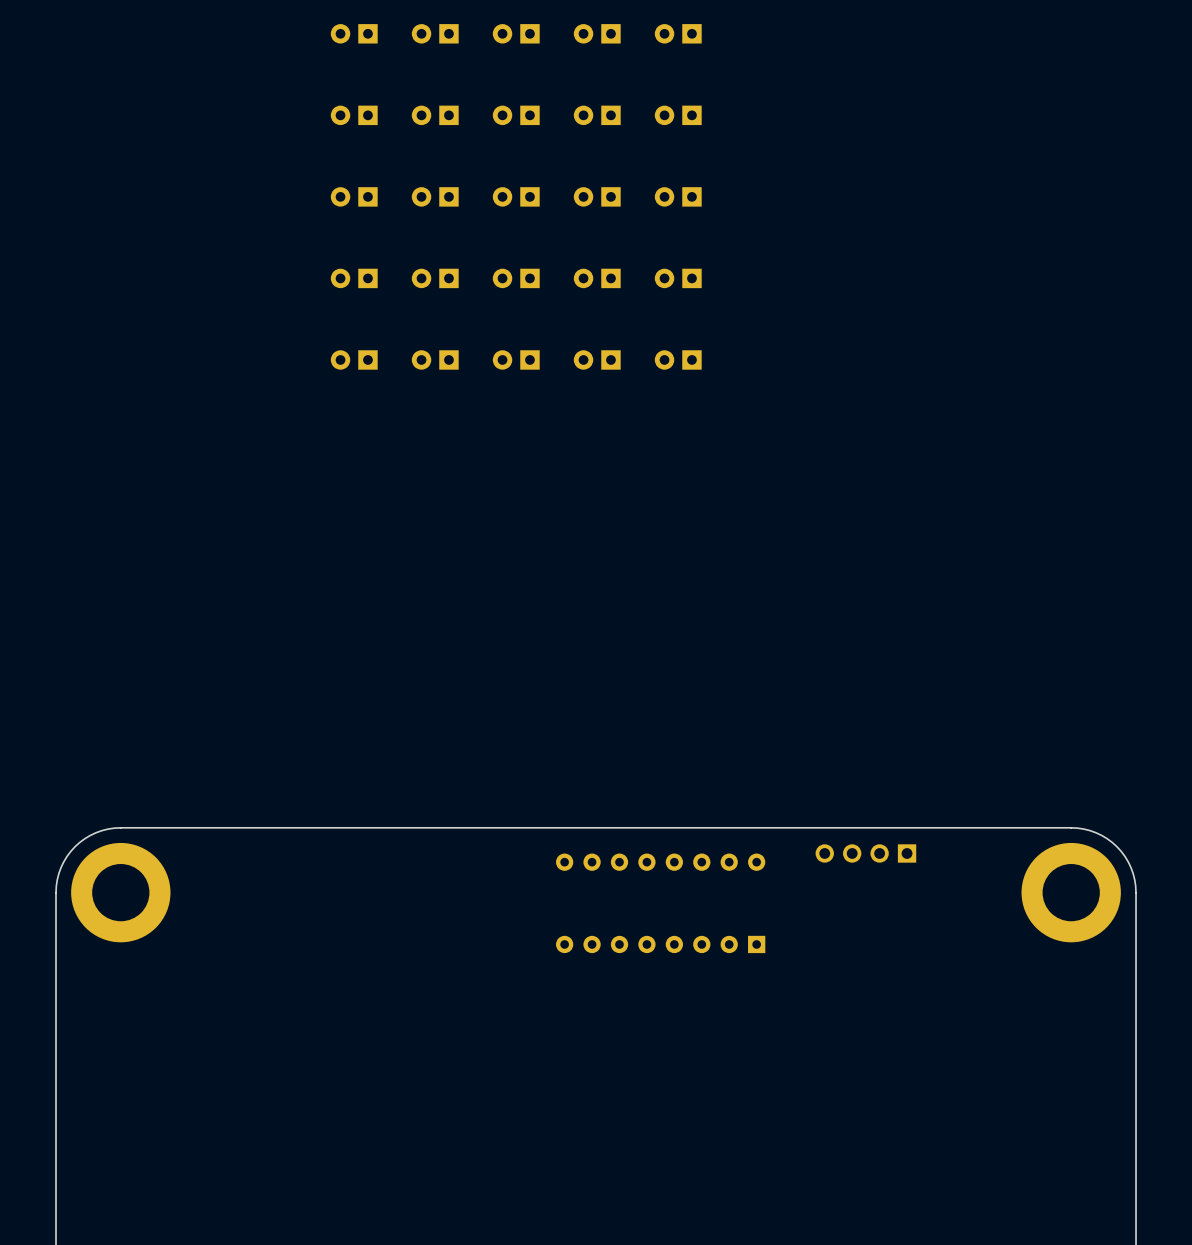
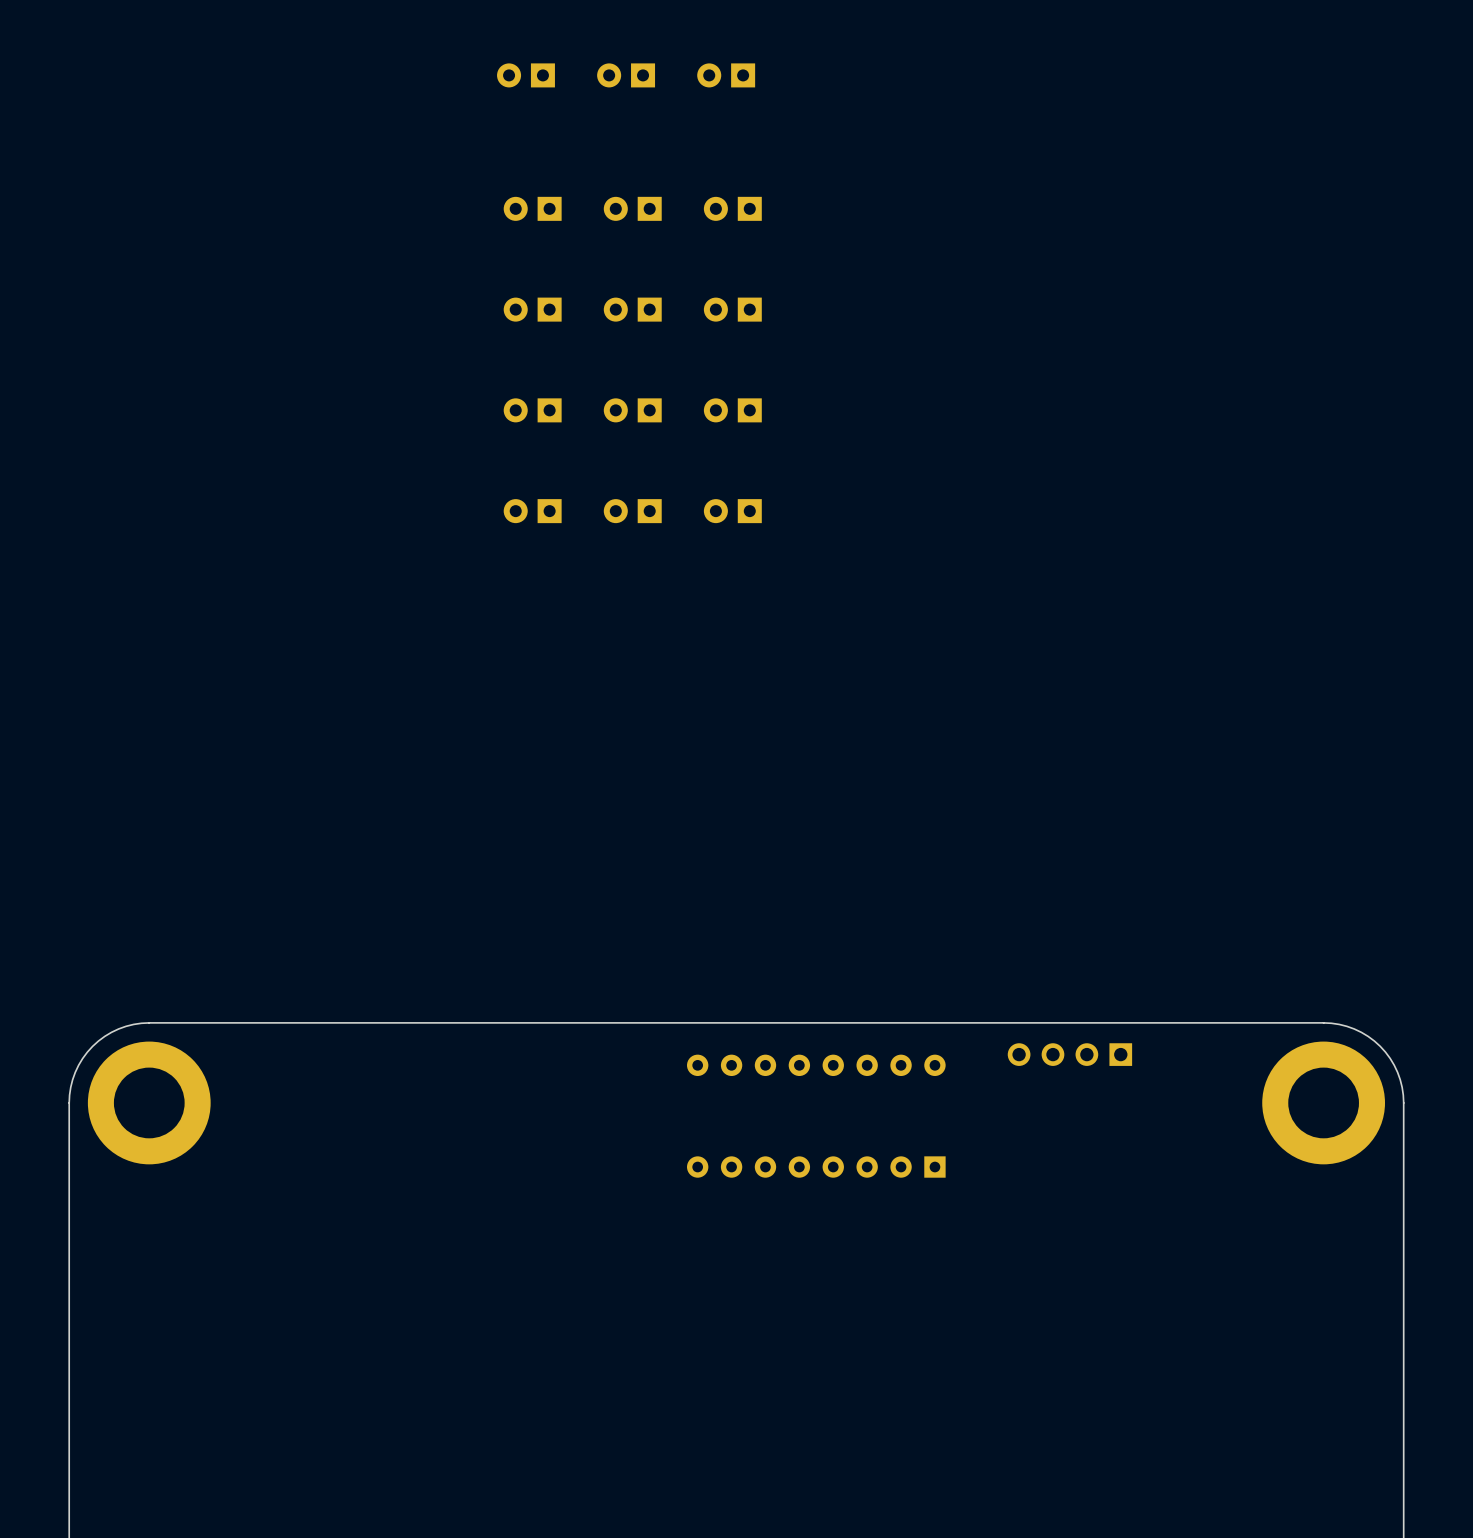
part: (354, 33) -> none
part: (435, 33) -> none
part: (516, 33) -> none
part: (597, 33) -> none
part: (678, 33) -> none
part: none -> (526, 75)
part: none -> (626, 75)
part: none -> (726, 75)
part: (354, 115) -> none
part: (435, 115) -> none
part: (516, 115) -> none
part: (597, 115) -> none
part: (678, 115) -> none
part: none -> (532, 208)
part: none -> (632, 208)
part: none -> (732, 208)
part: (354, 196) -> none
part: (435, 196) -> none
part: (516, 196) -> none
part: (597, 196) -> none
part: (678, 196) -> none
part: none -> (532, 309)
part: none -> (632, 309)
part: none -> (732, 309)
part: (354, 278) -> none
part: (435, 278) -> none
part: (516, 278) -> none
part: (597, 278) -> none
part: (678, 278) -> none
part: none -> (532, 410)
part: none -> (632, 410)
part: none -> (732, 410)
part: (354, 359) -> none
part: (435, 359) -> none
part: (516, 359) -> none
part: (597, 359) -> none
part: (678, 359) -> none
part: none -> (532, 511)
part: none -> (632, 511)
part: none -> (732, 511)

